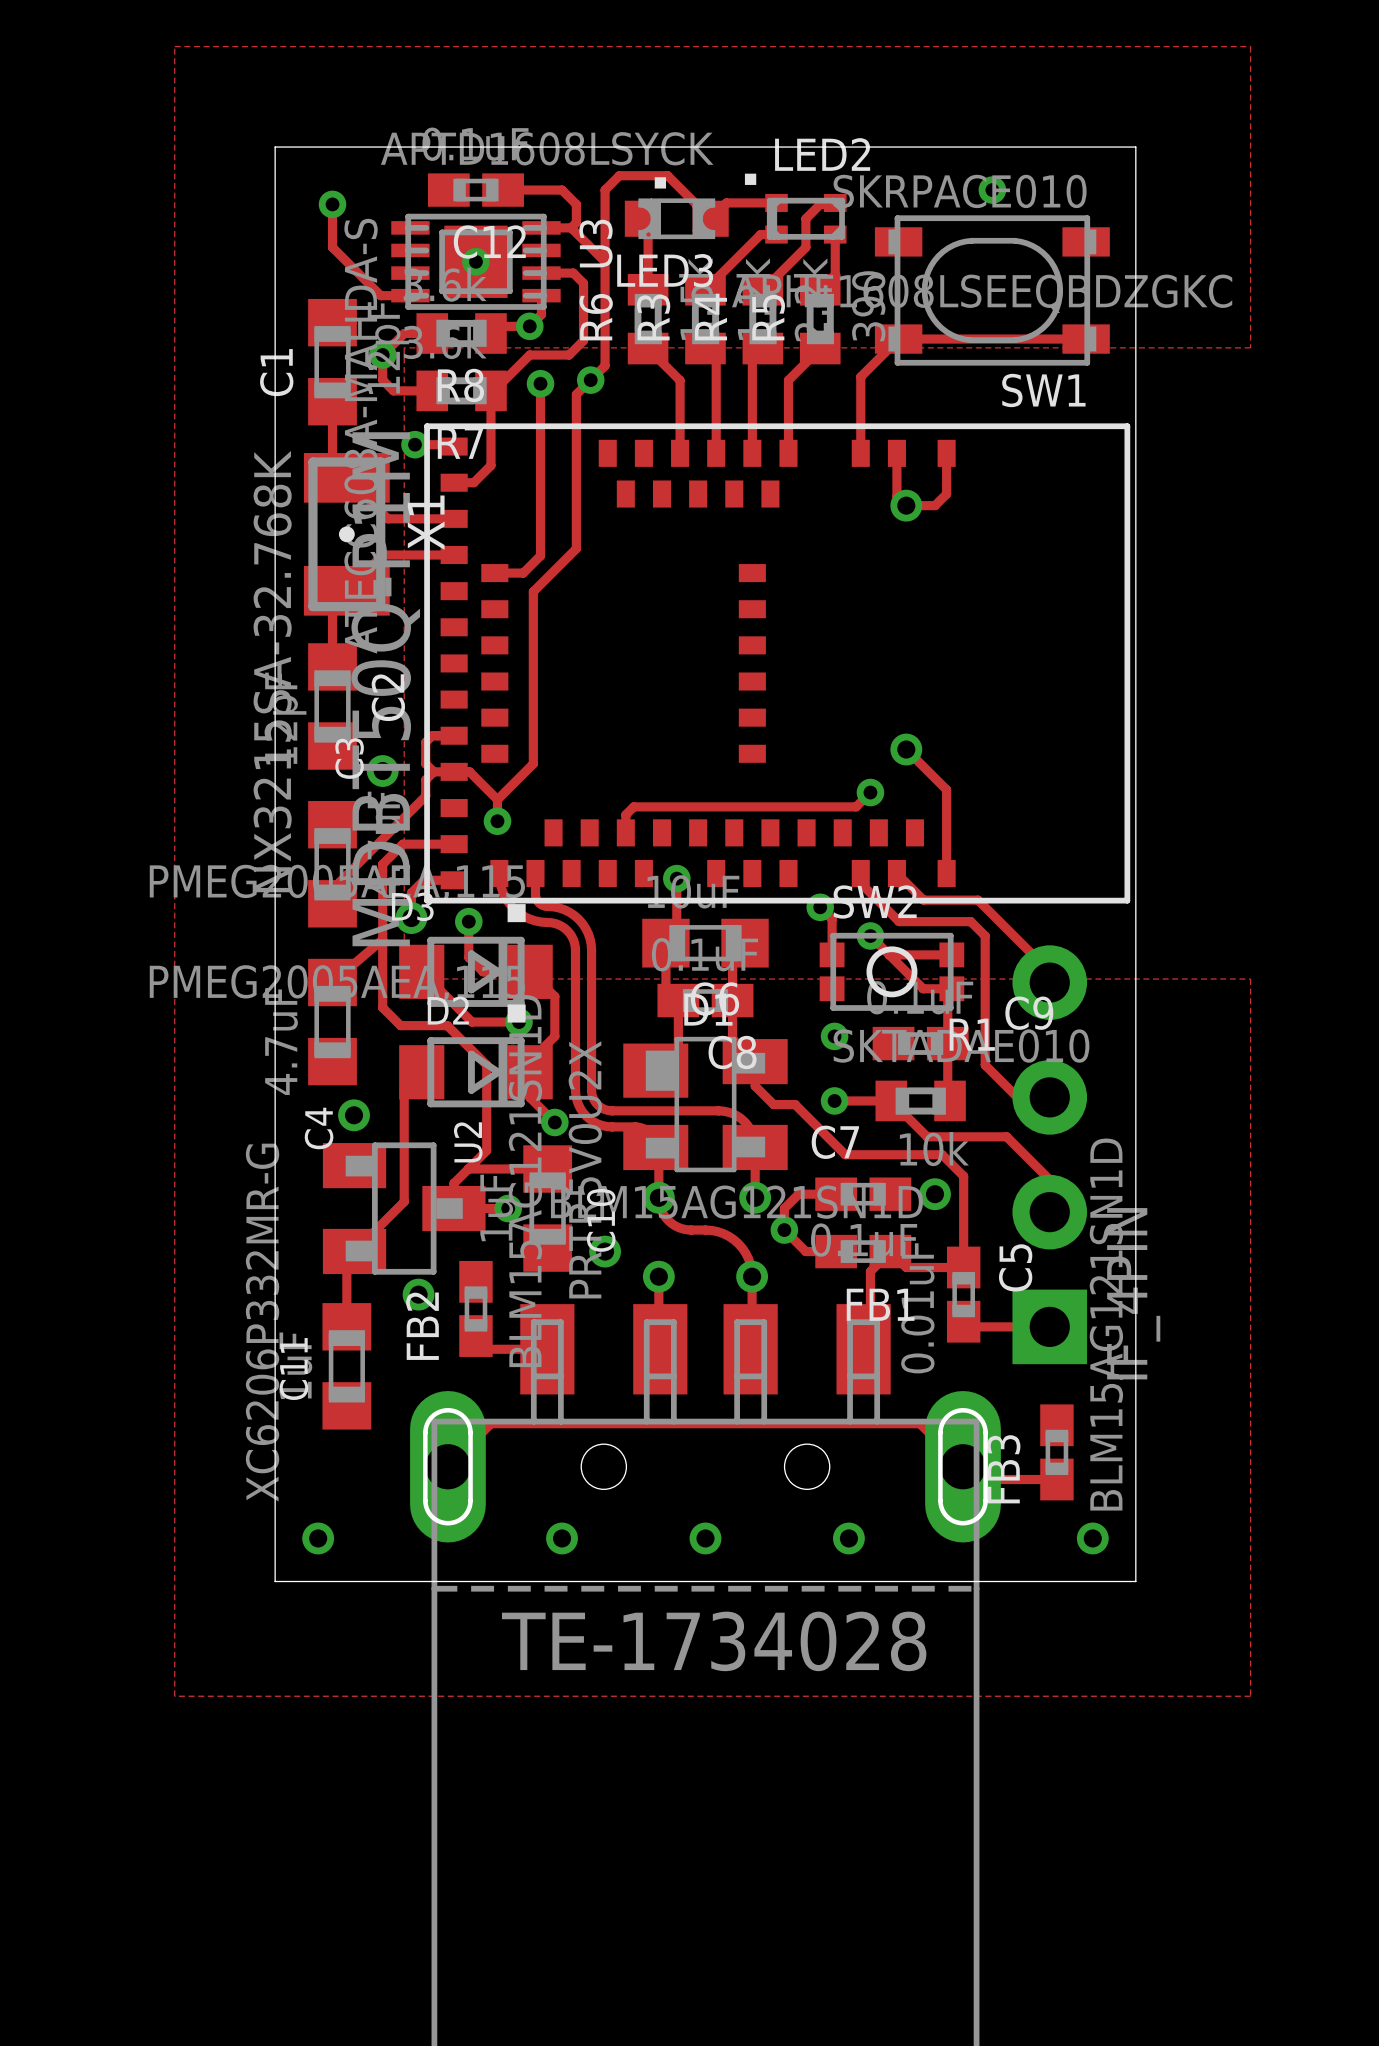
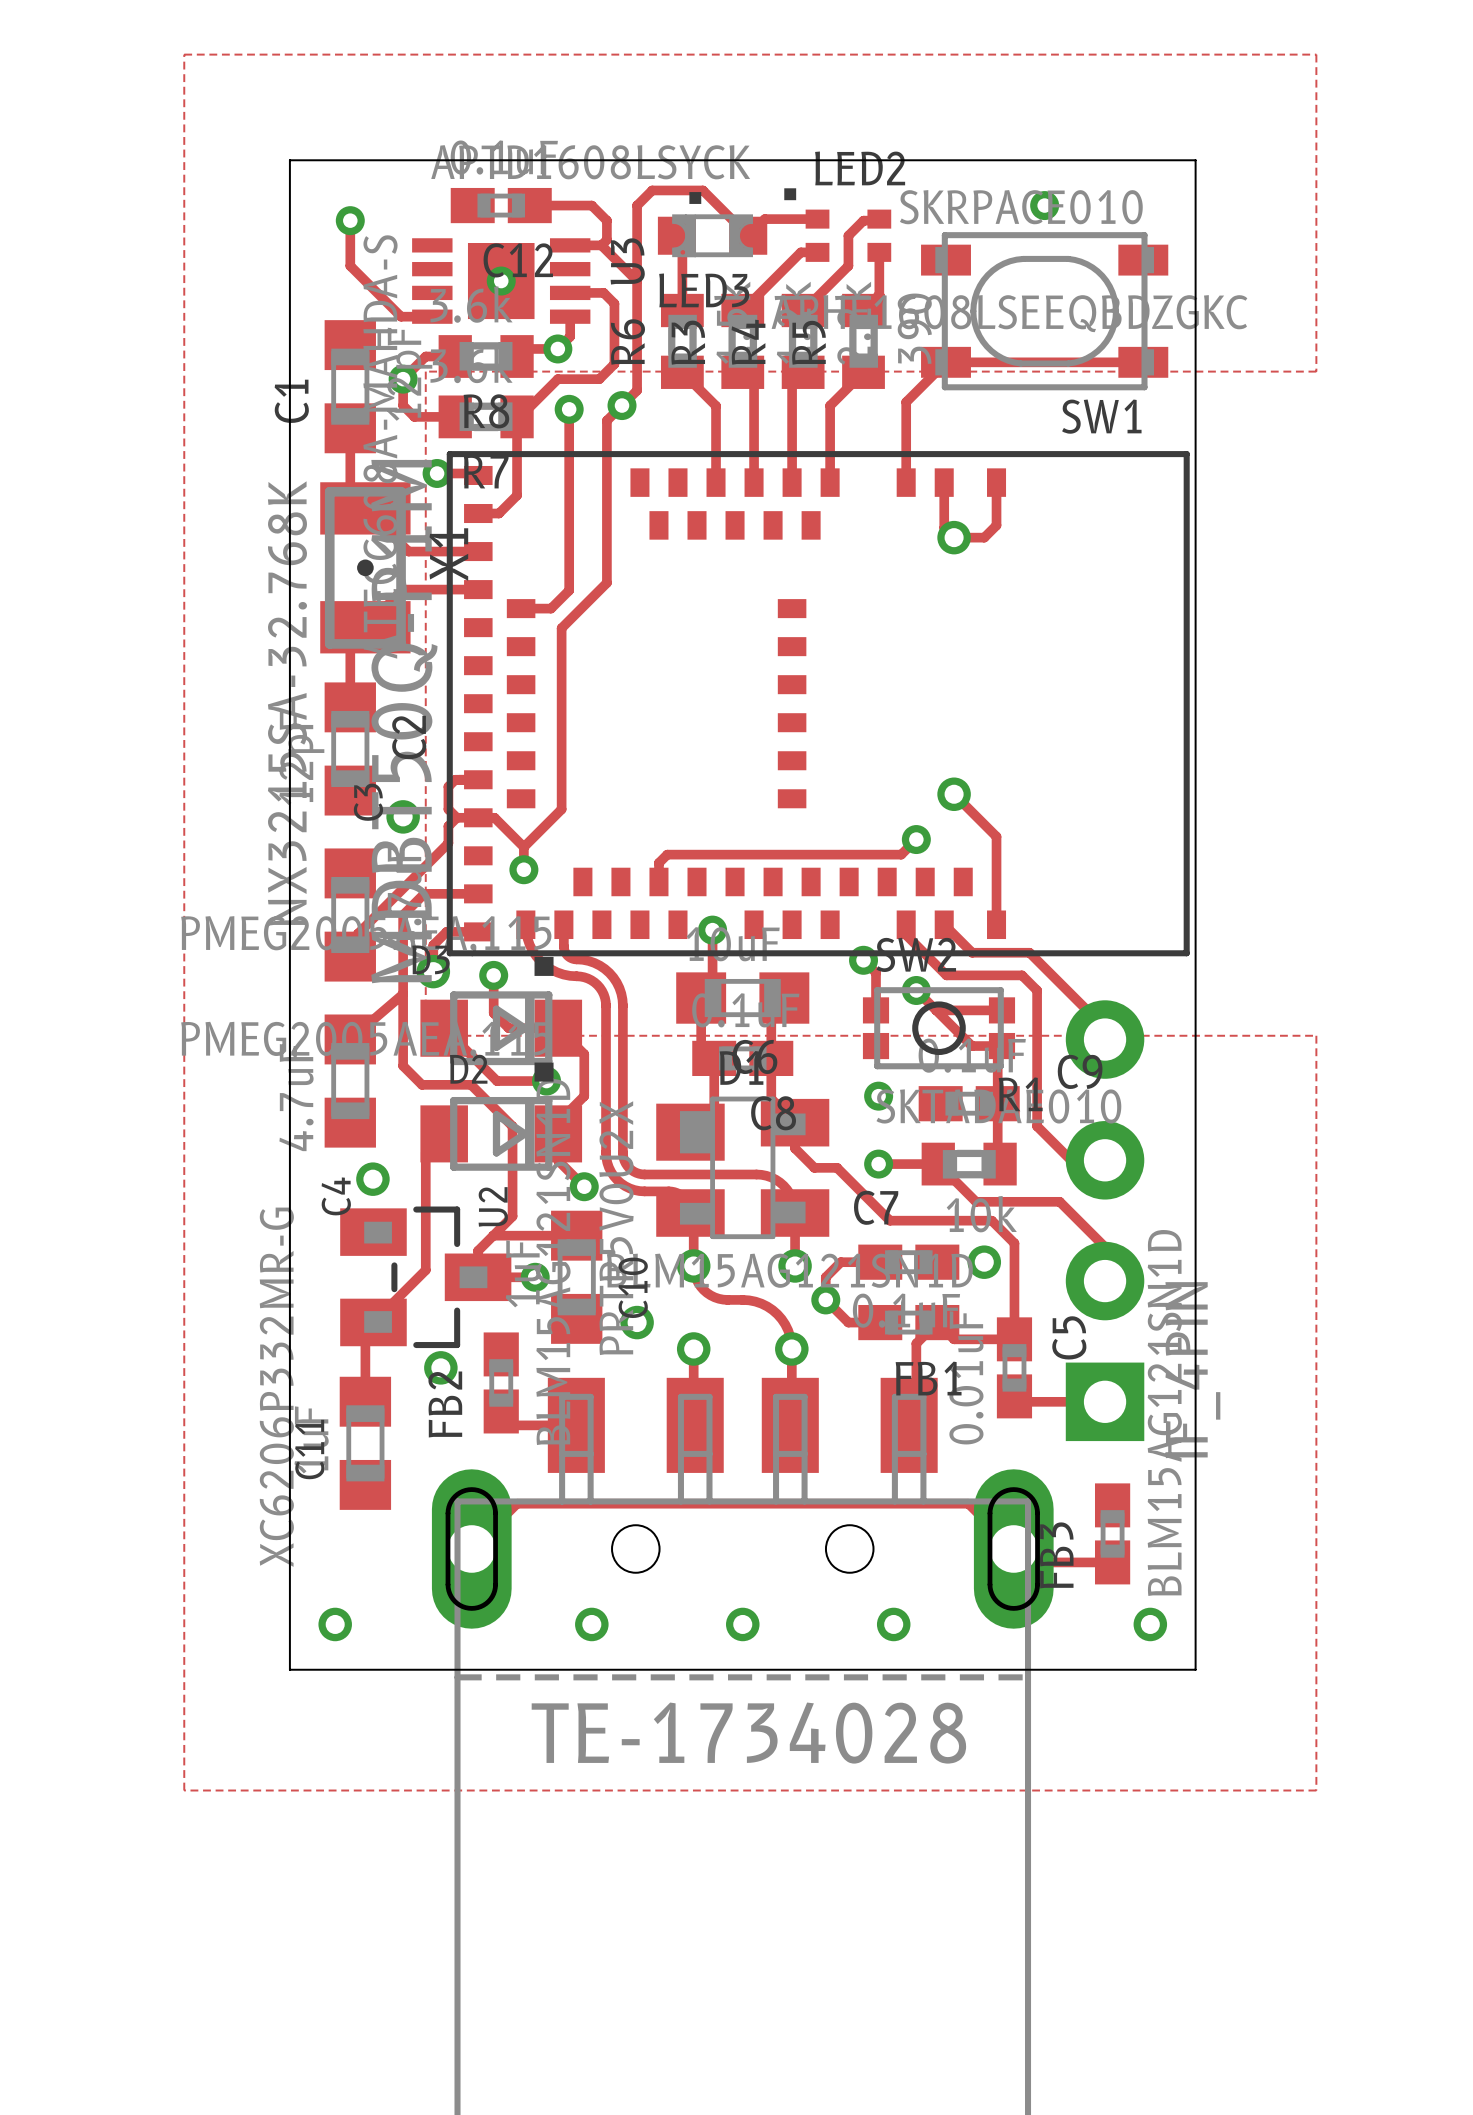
LED2 footprint: [744, 173, 847, 244] -> [784, 188, 892, 262]
U3 footprint: [391, 213, 561, 310] -> [412, 238, 591, 324]
U2 footprint: [322, 1142, 486, 1275] -> [340, 1206, 512, 1349]

